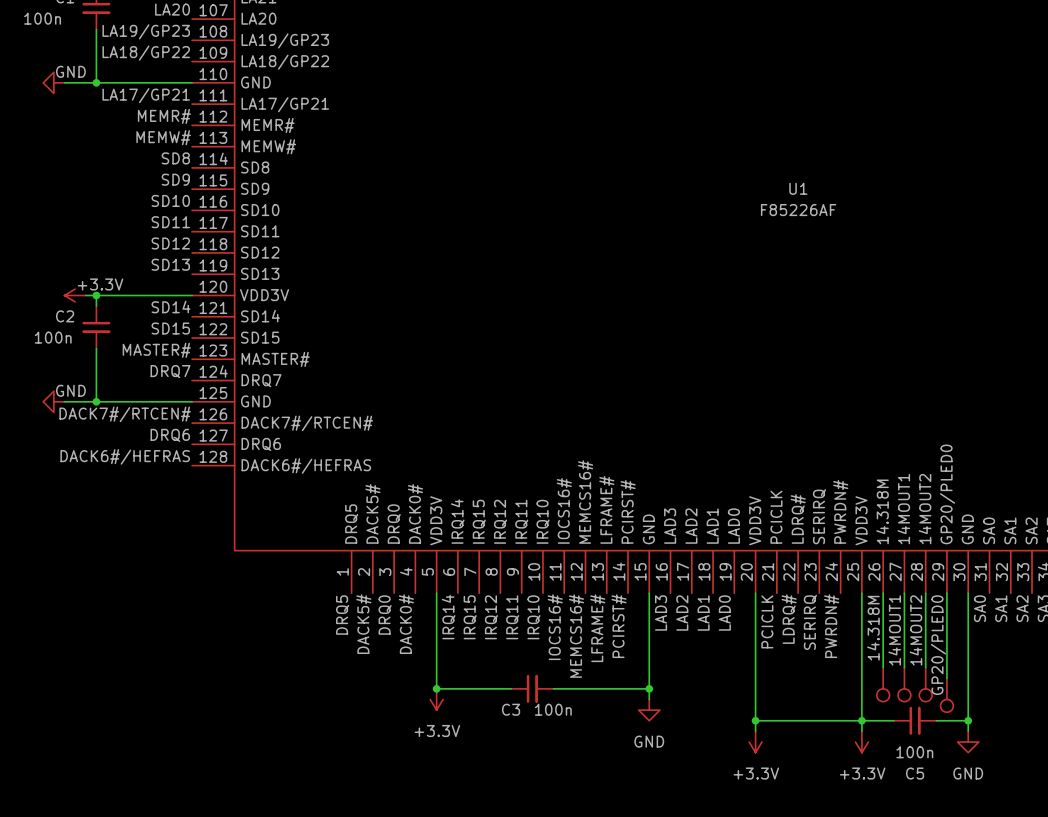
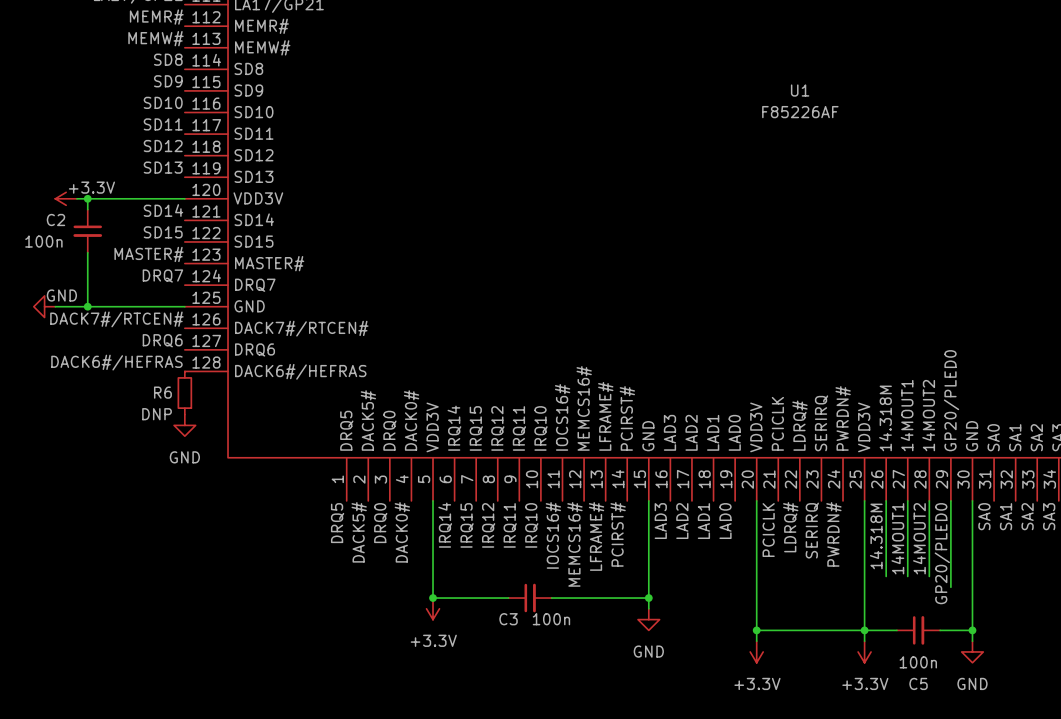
R6: none -> DNP (184, 393)
power symbol: none -> GND (184, 425)
part: (883, 684) -> none
part: (904, 684) -> none
part: (925, 684) -> none
part: (946, 695) -> none

